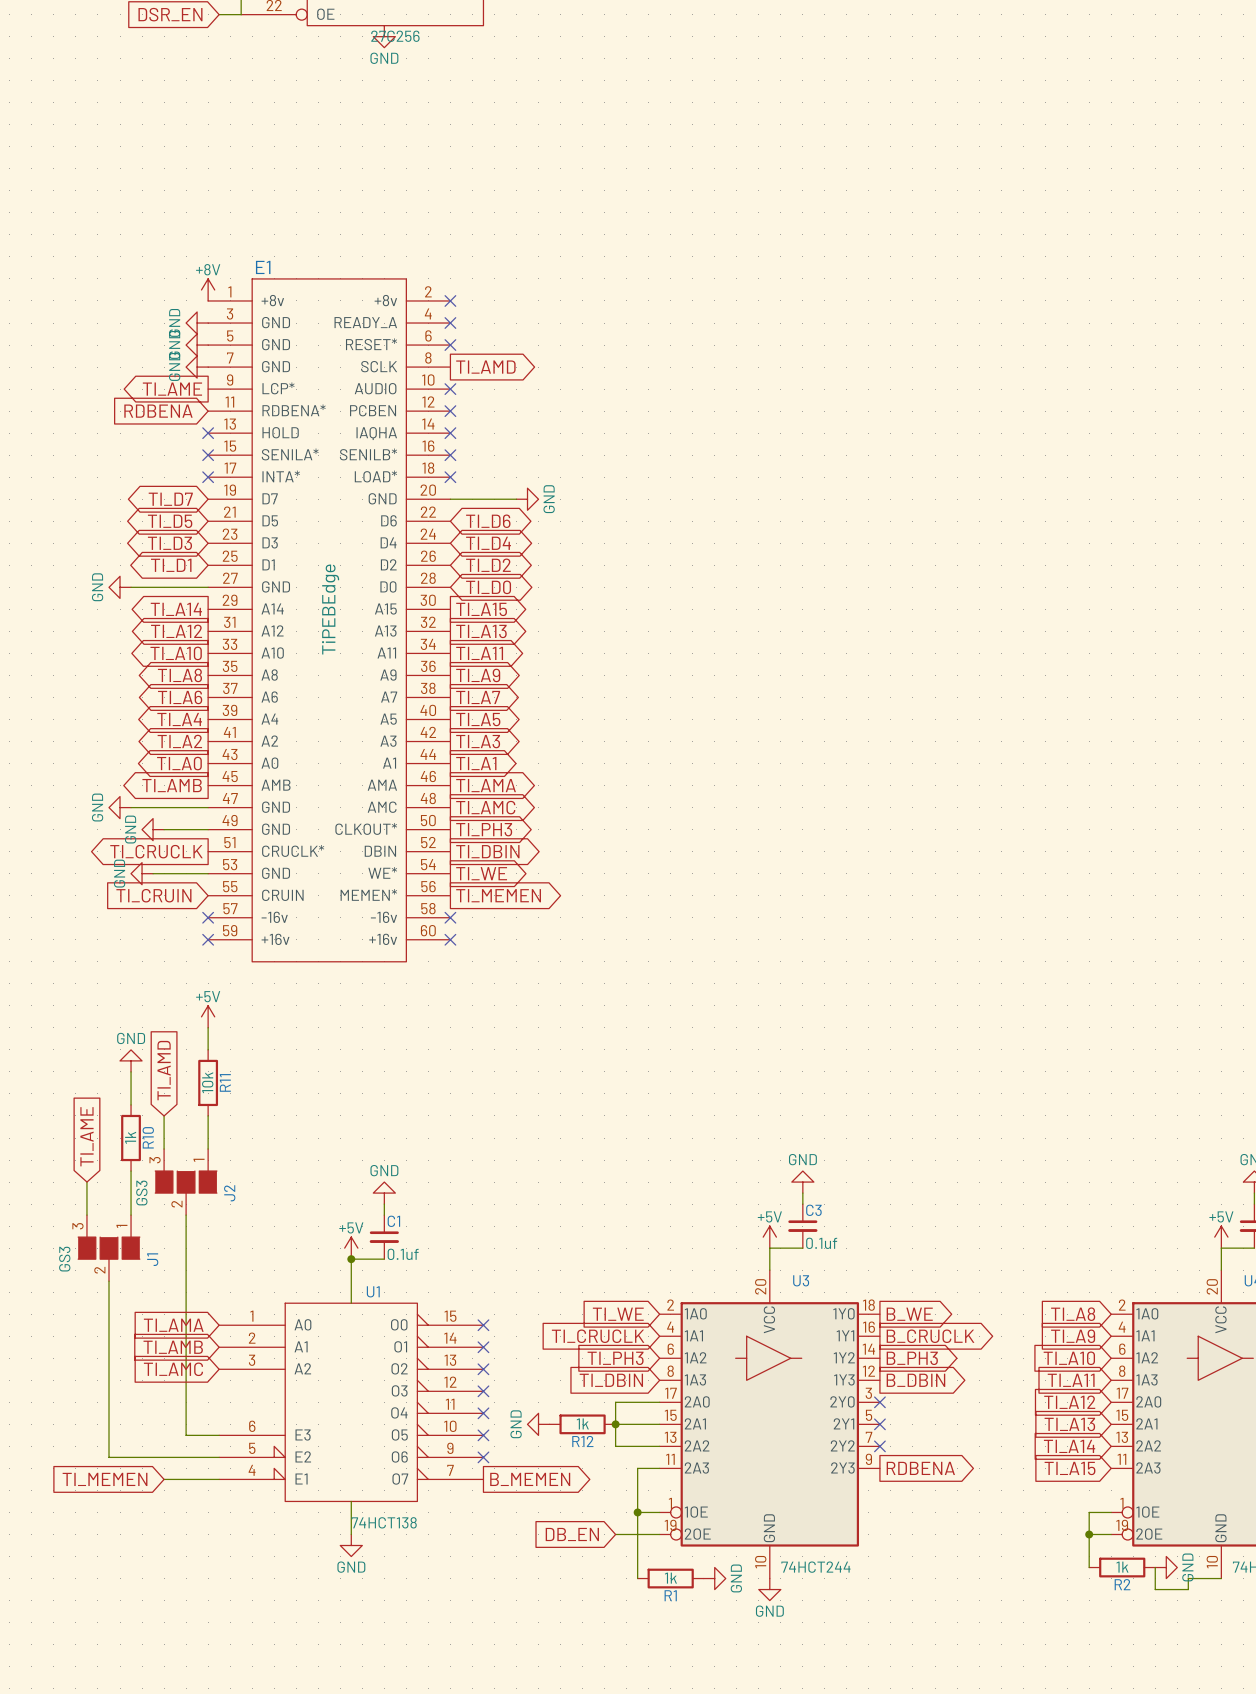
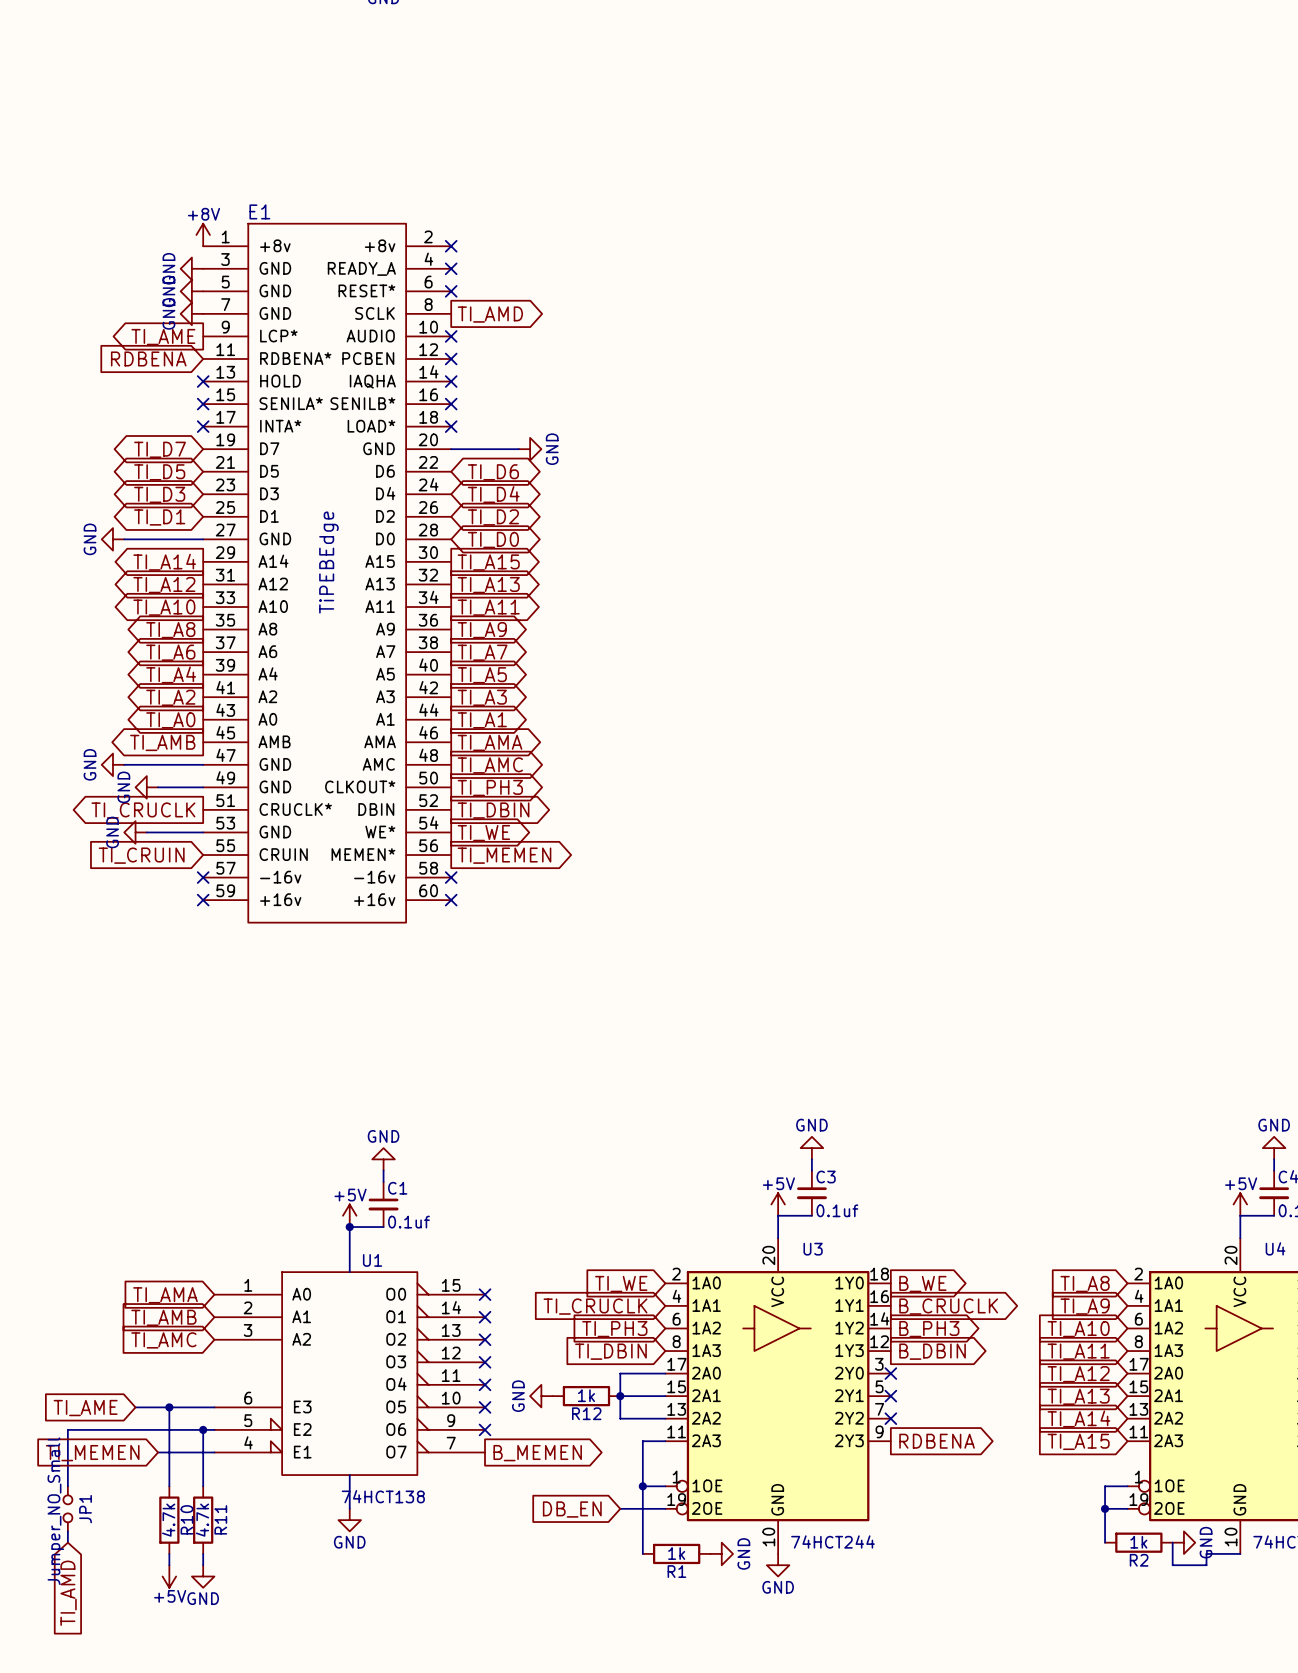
power symbol: +5V (208, 1016) -> none
wire: (208, 1027) (208, 1049) -> none
power symbol: GND (131, 1060) -> none
global label: TI_AMD (164, 1070) -> none
wire: (131, 1071) (131, 1104) -> none
R11 value: 10k (207, 1082) -> 4.7k (202, 1520)
R11 position: (208, 1082) -> (203, 1520)
wire: (164, 1115) (164, 1149) -> none
wire: (208, 1115) (208, 1149) -> none
global label: TI_AME (86, 1136) -> none
R10 value: 1k (130, 1137) -> 4.7k (168, 1520)
R10 position: (131, 1138) -> (169, 1520)
wire: (131, 1171) (131, 1215) -> none
wire: (86, 1182) (86, 1215) -> none
J2: GS3 (186, 1182) -> none
wire: (186, 1215) (186, 1435) -> (135, 1407) (180, 1407)
J1: GS3 (109, 1248) -> none
wire: (109, 1281) (109, 1457) -> (67, 1486) (67, 1429) (101, 1429)
global label: none -> TI_AME (85, 1408)
wire: none -> (169, 1407) (169, 1486)
junction: none -> (169, 1407)
wire: none -> (203, 1429) (203, 1486)
junction: none -> (203, 1429)
JP1: none -> Jumper_NO_Small (67, 1508)
wire: none -> (67, 1531) (67, 1542)
wire: none -> (169, 1553) (169, 1565)
wire: none -> (203, 1553) (203, 1565)
power symbol: none -> +5V (169, 1576)
power symbol: none -> GND (203, 1576)
global label: none -> TI_AMD (68, 1593)

